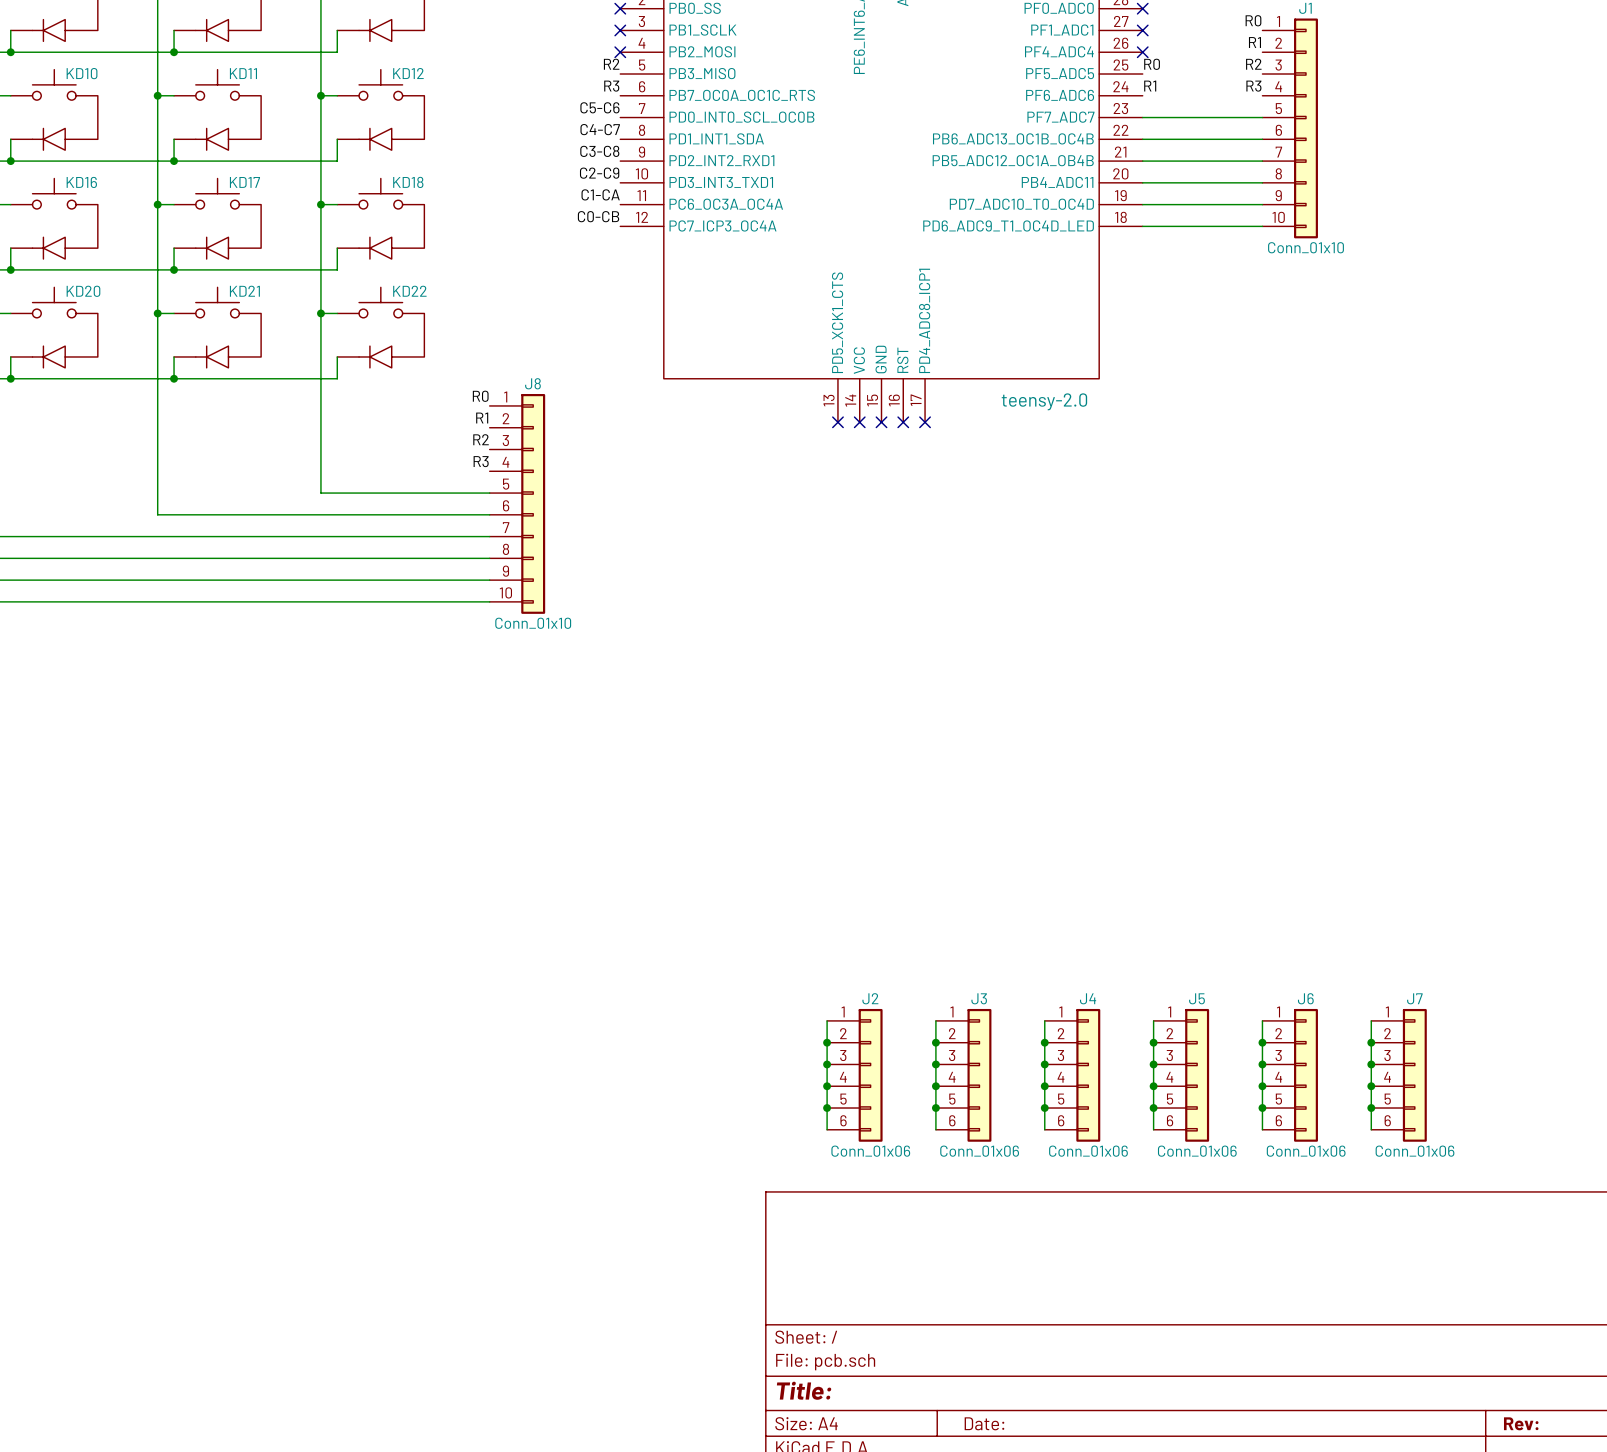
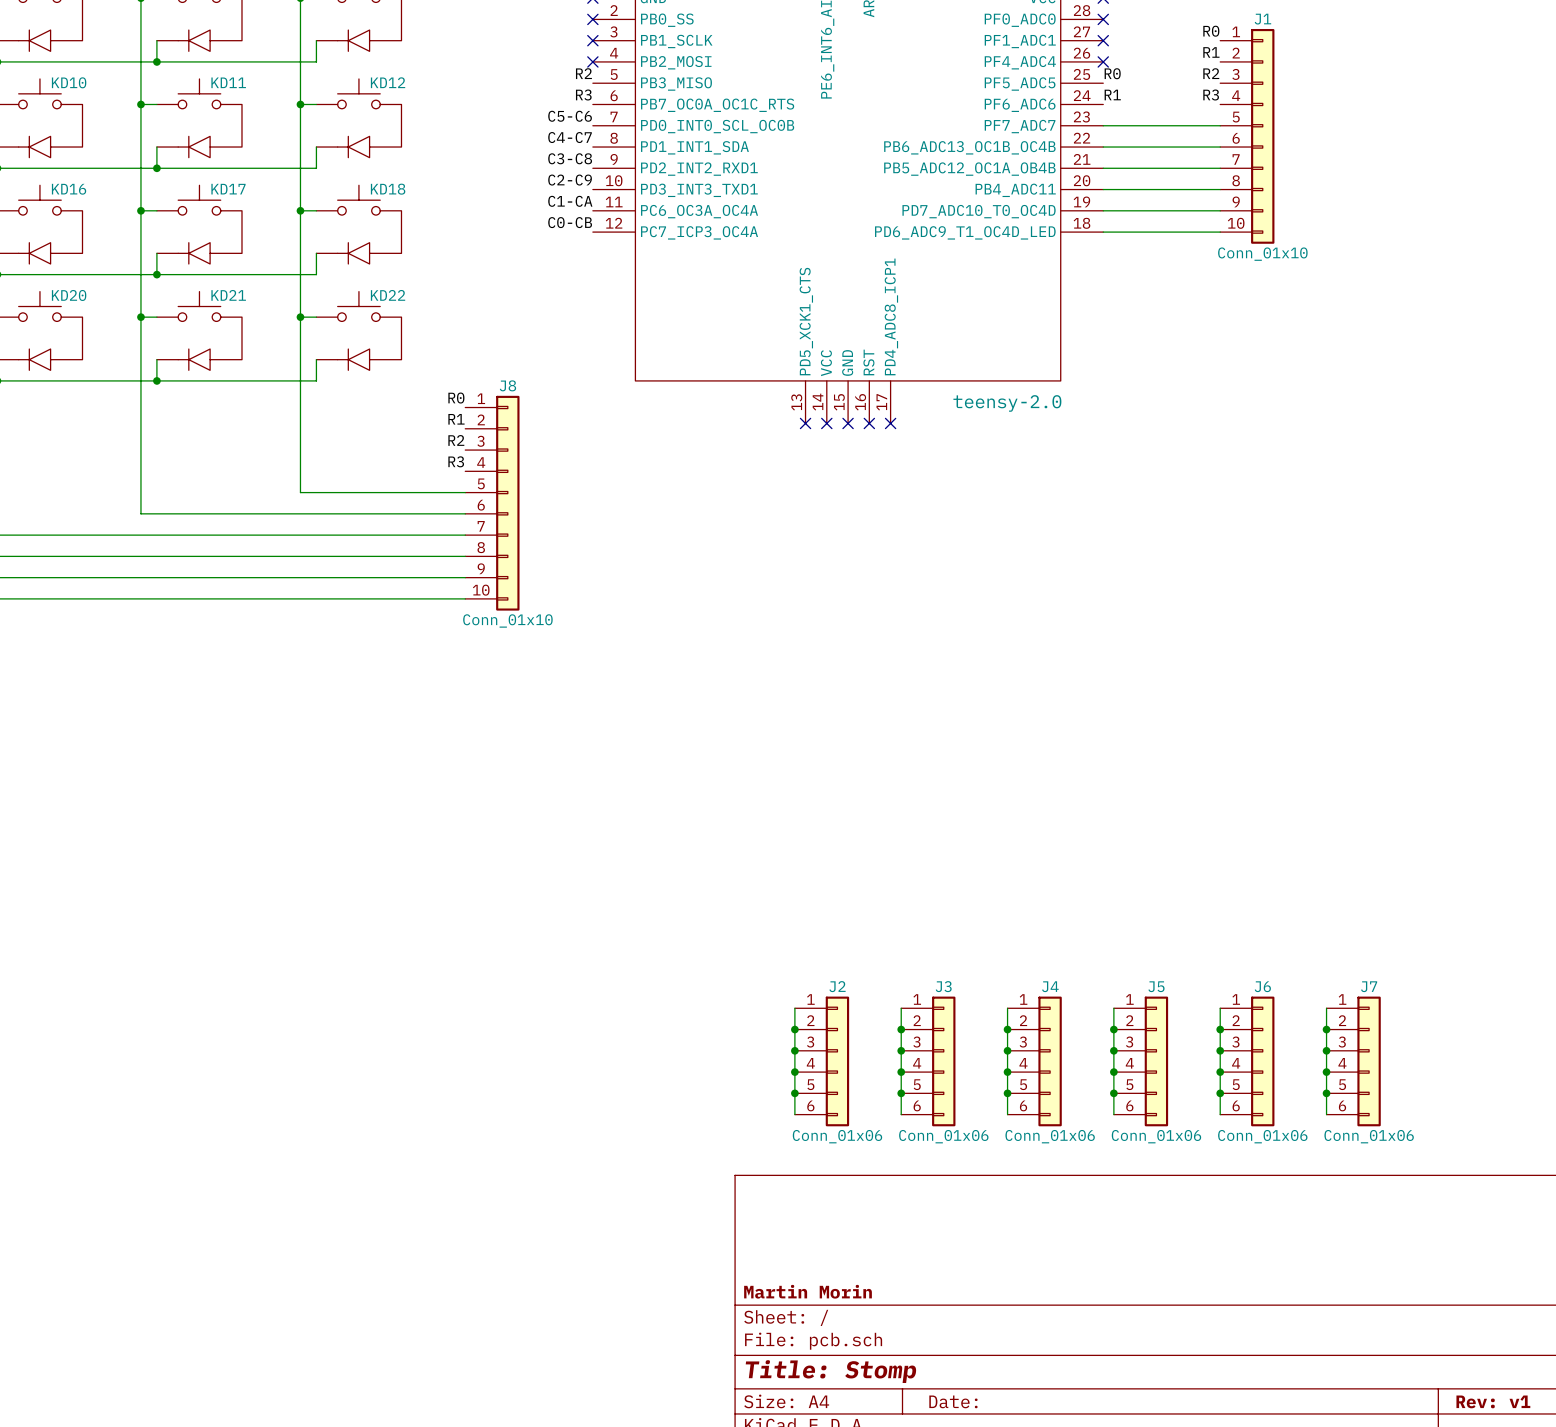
title block: none -> Martin Morin (808, 1291)
title block: Title: (804, 1390) -> Title: Stomp (830, 1371)
title block: Rev: (1521, 1423) -> Rev: v1 (1493, 1401)

